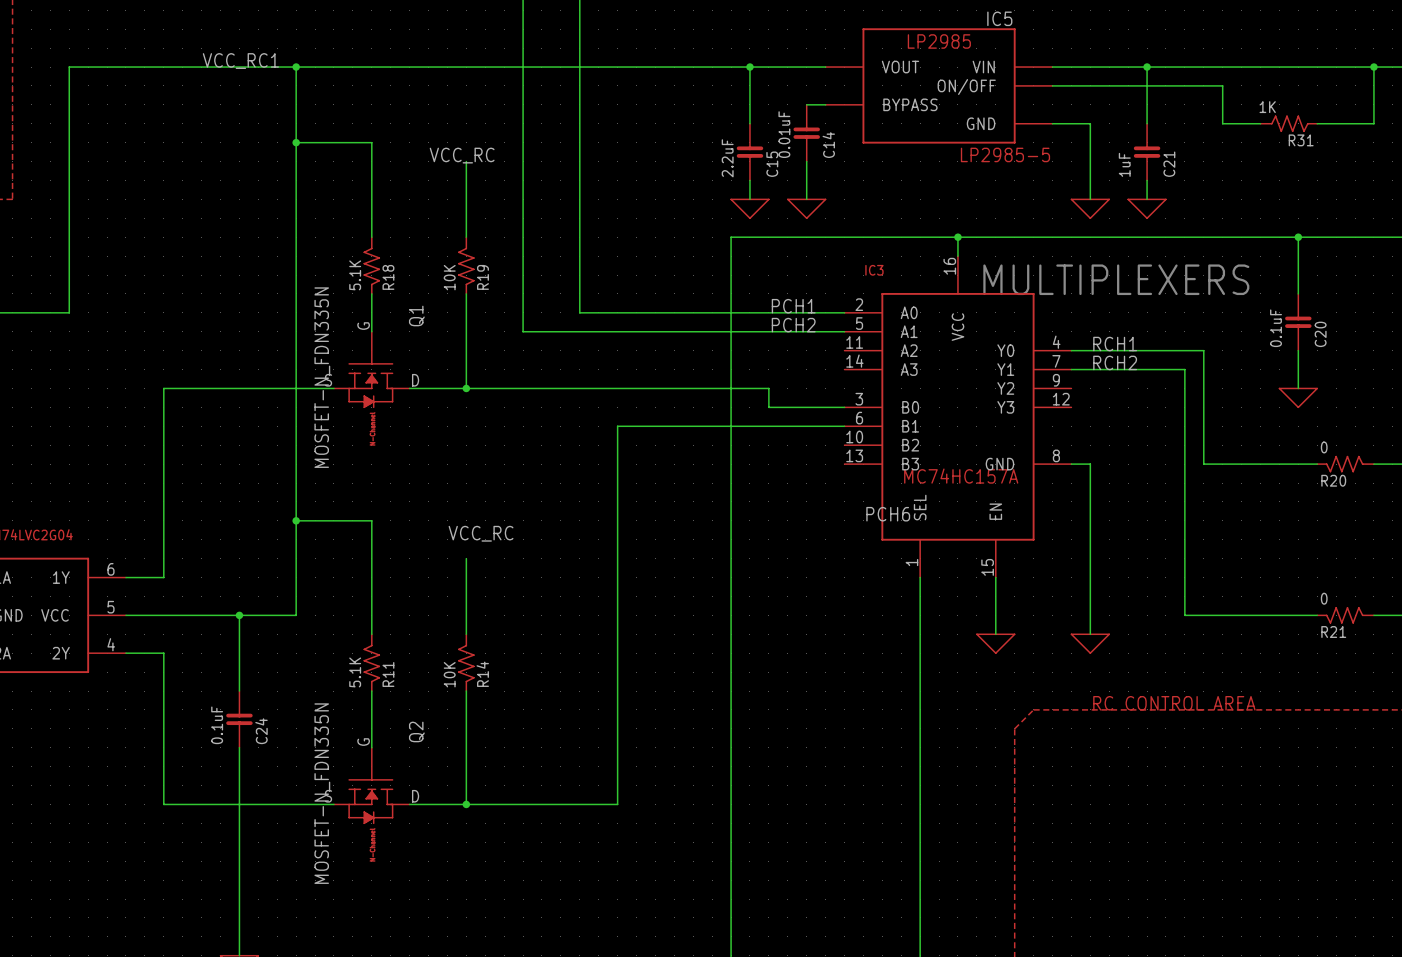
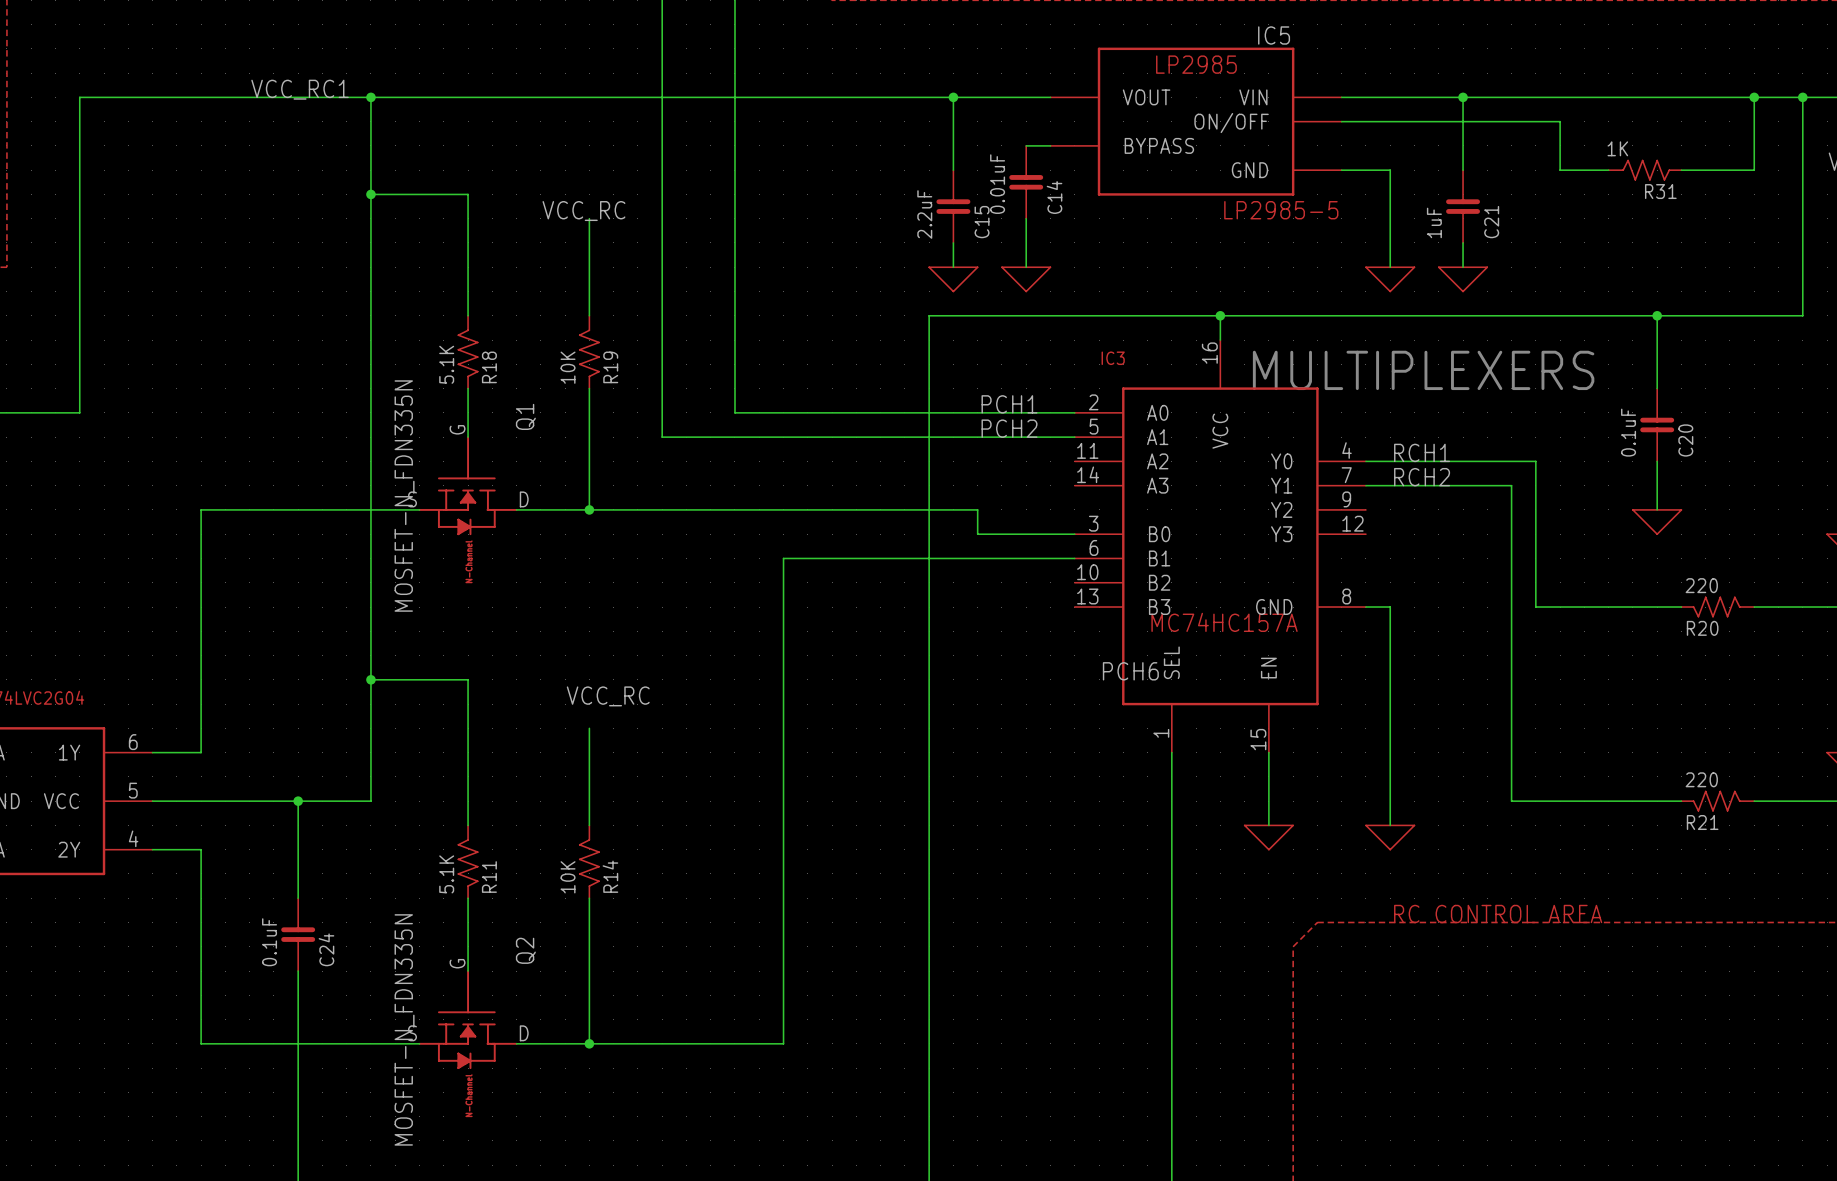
R20 value: 0 (1324, 447) -> 220 (1701, 585)
R21 value: 0 (1324, 598) -> 220 (1701, 779)

